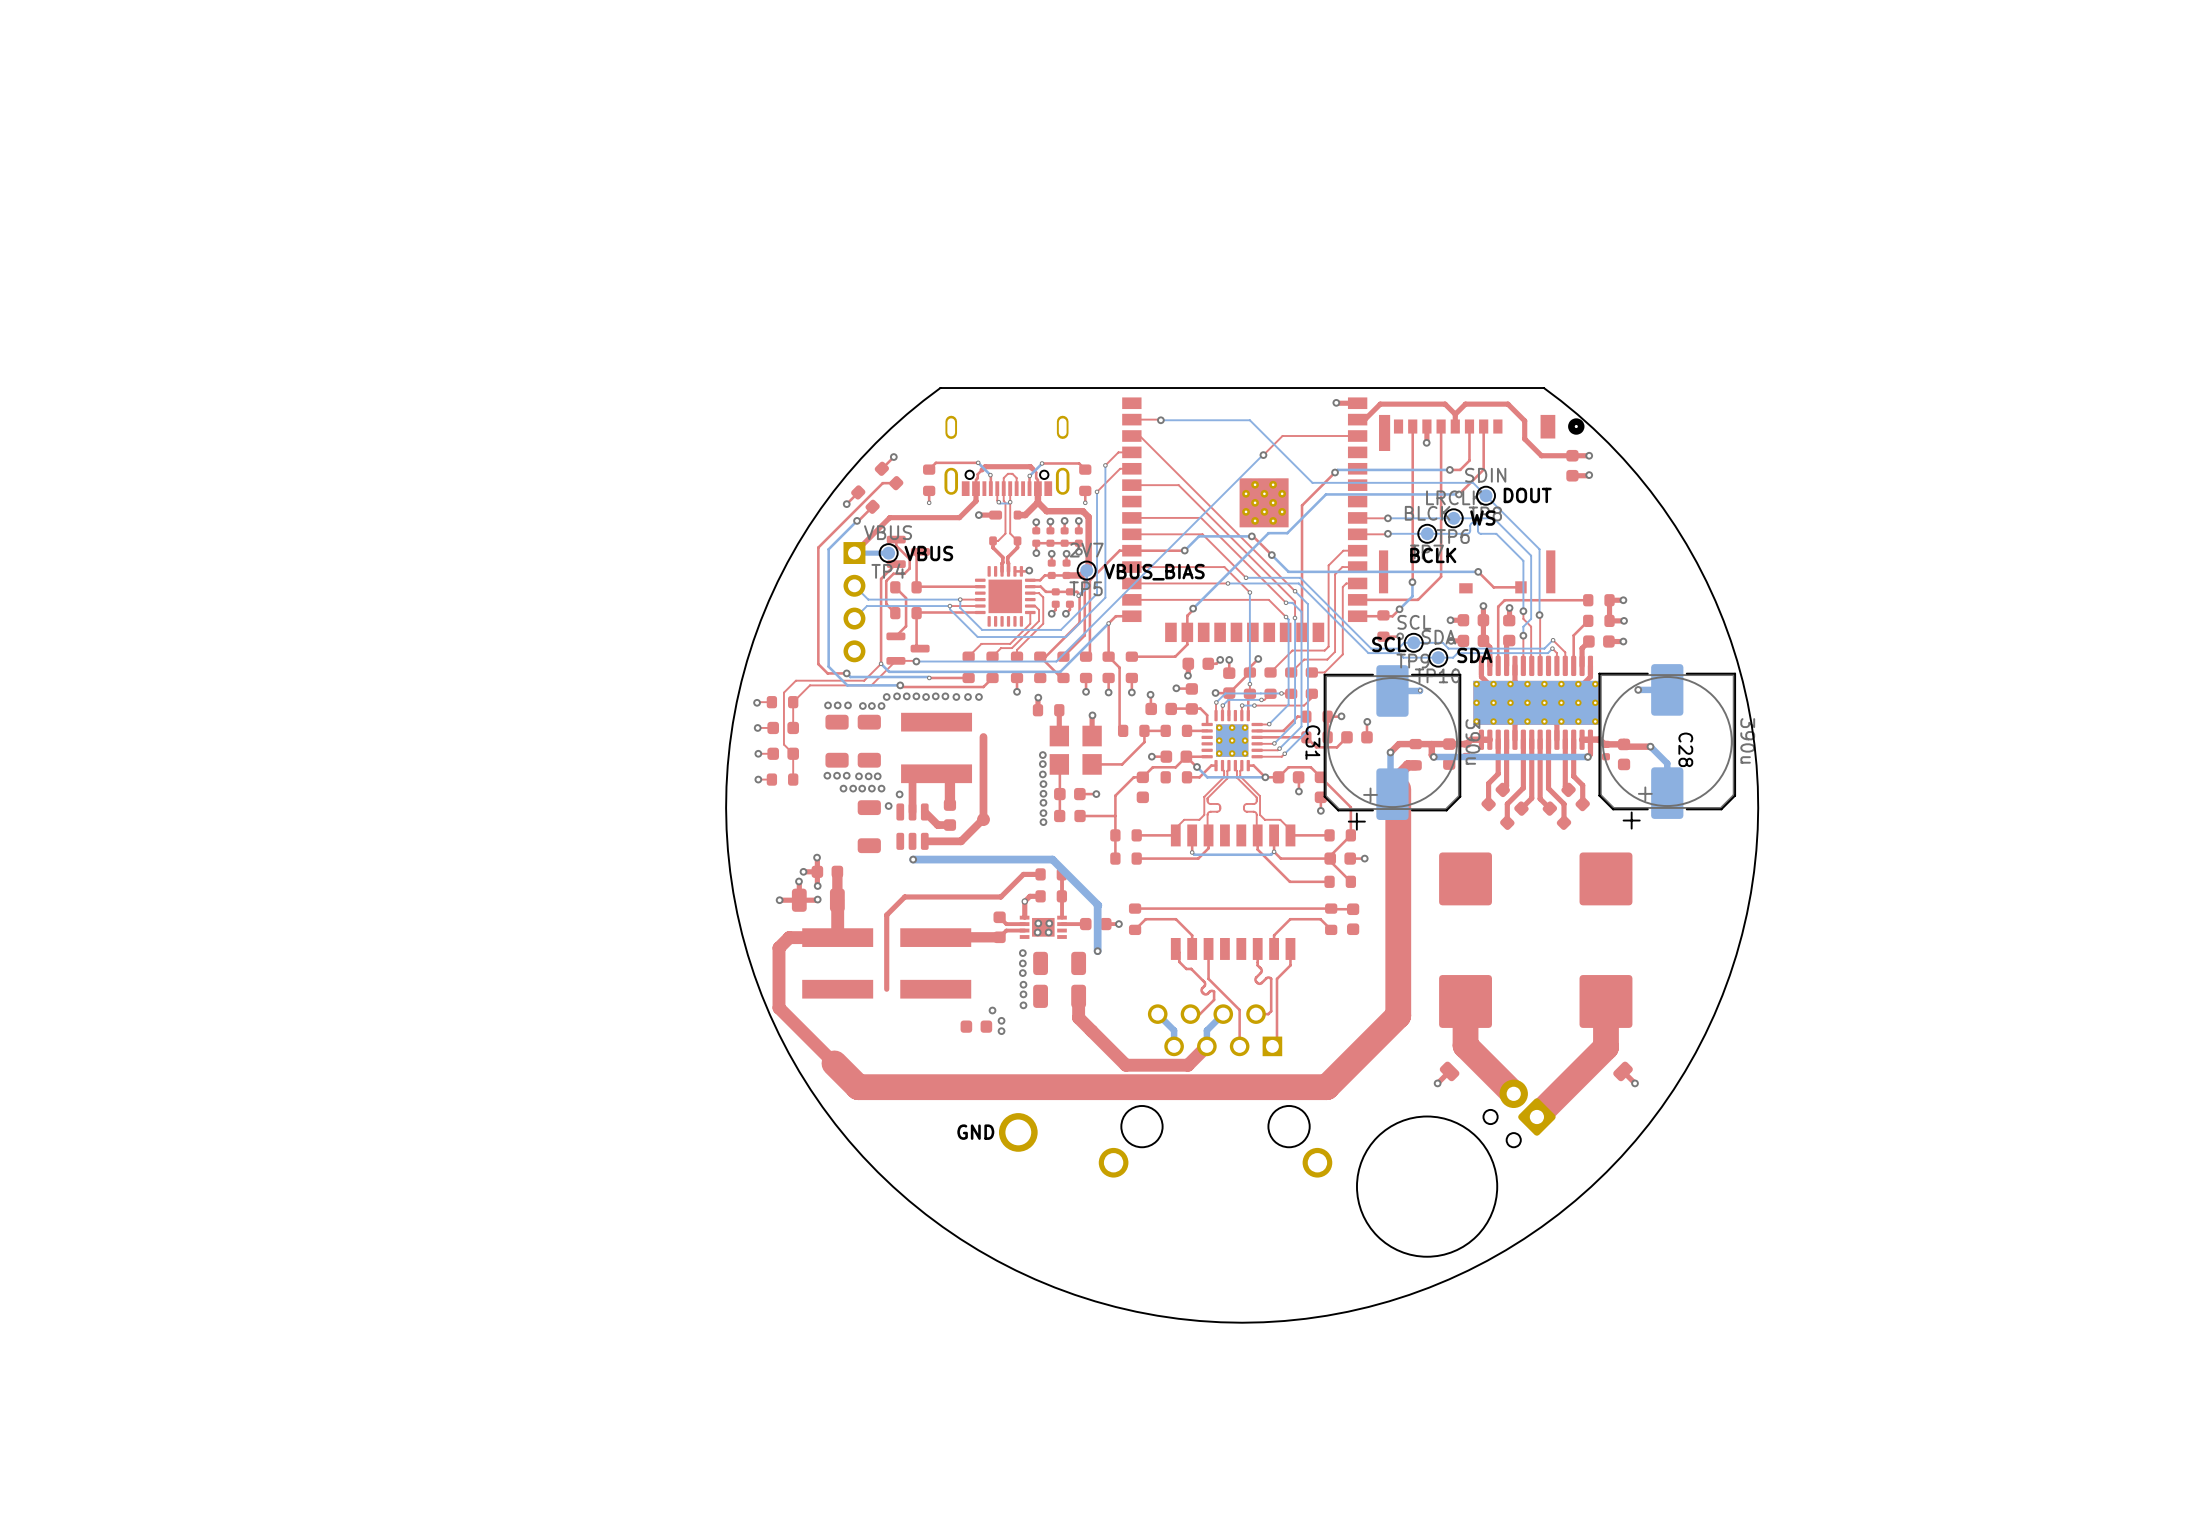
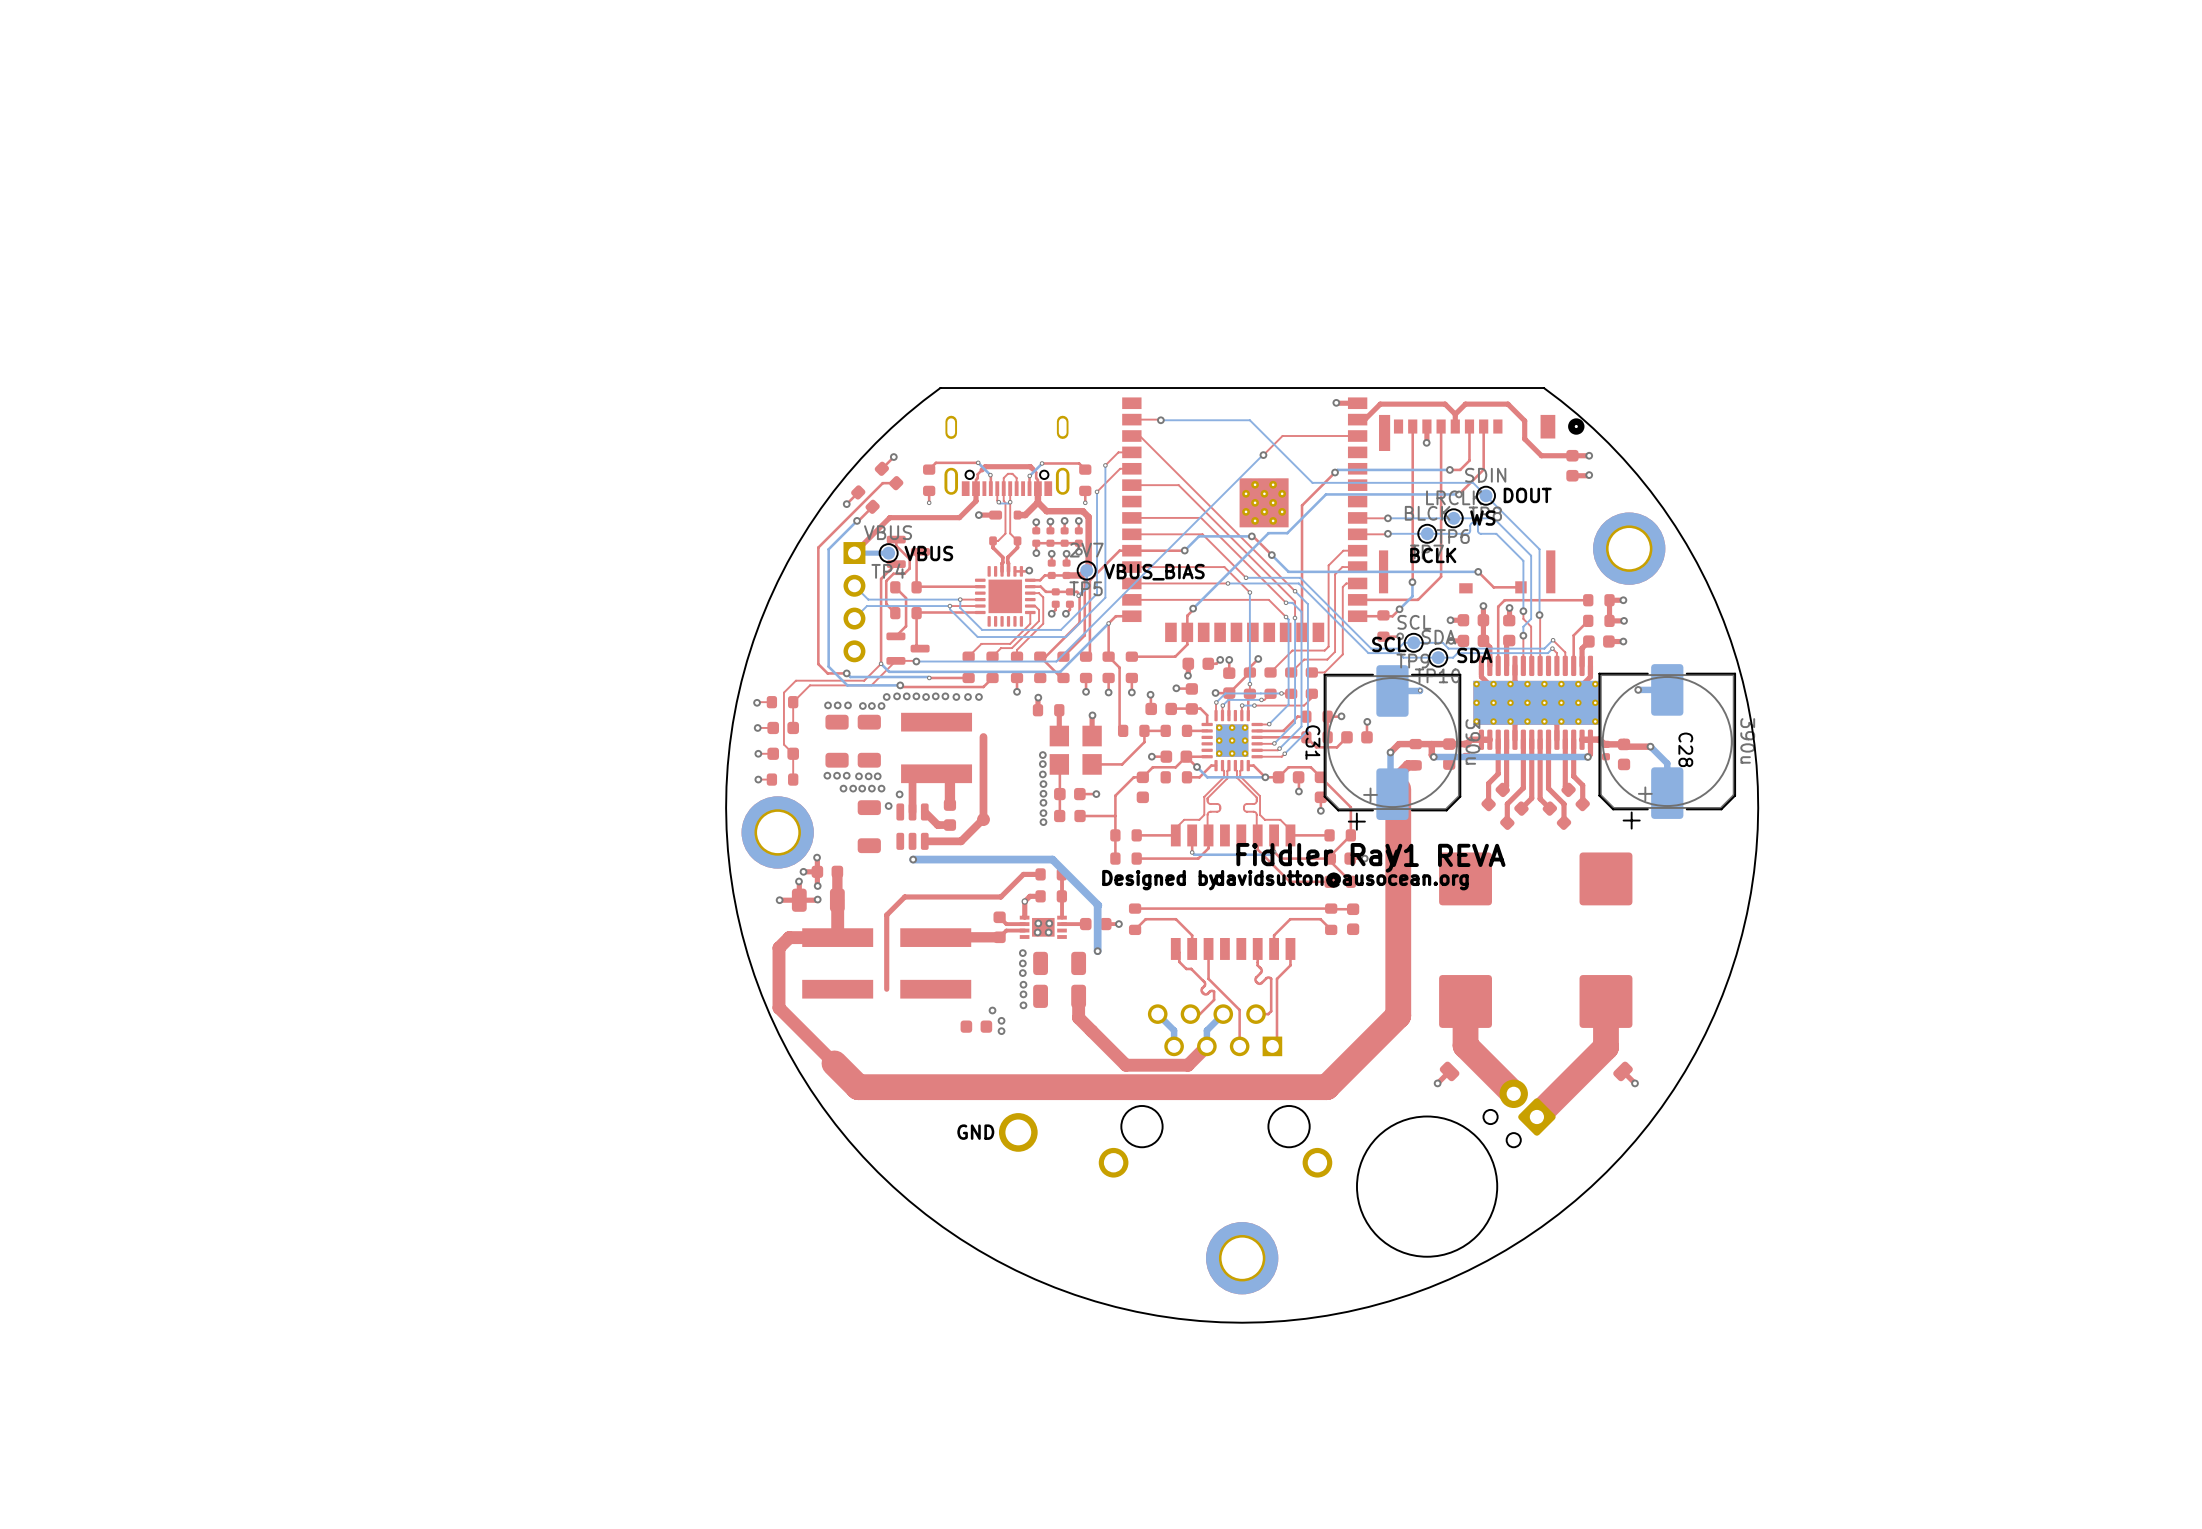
part: none -> (1629, 548)
part: none -> (777, 832)
text: none -> V1 REVA (1445, 855)
text: none -> Fiddler Ray (1317, 857)
text: none -> Designed by: (1163, 880)
text: none -> davidsutton@ausocean.org (1341, 880)
part: none -> (1242, 1258)

